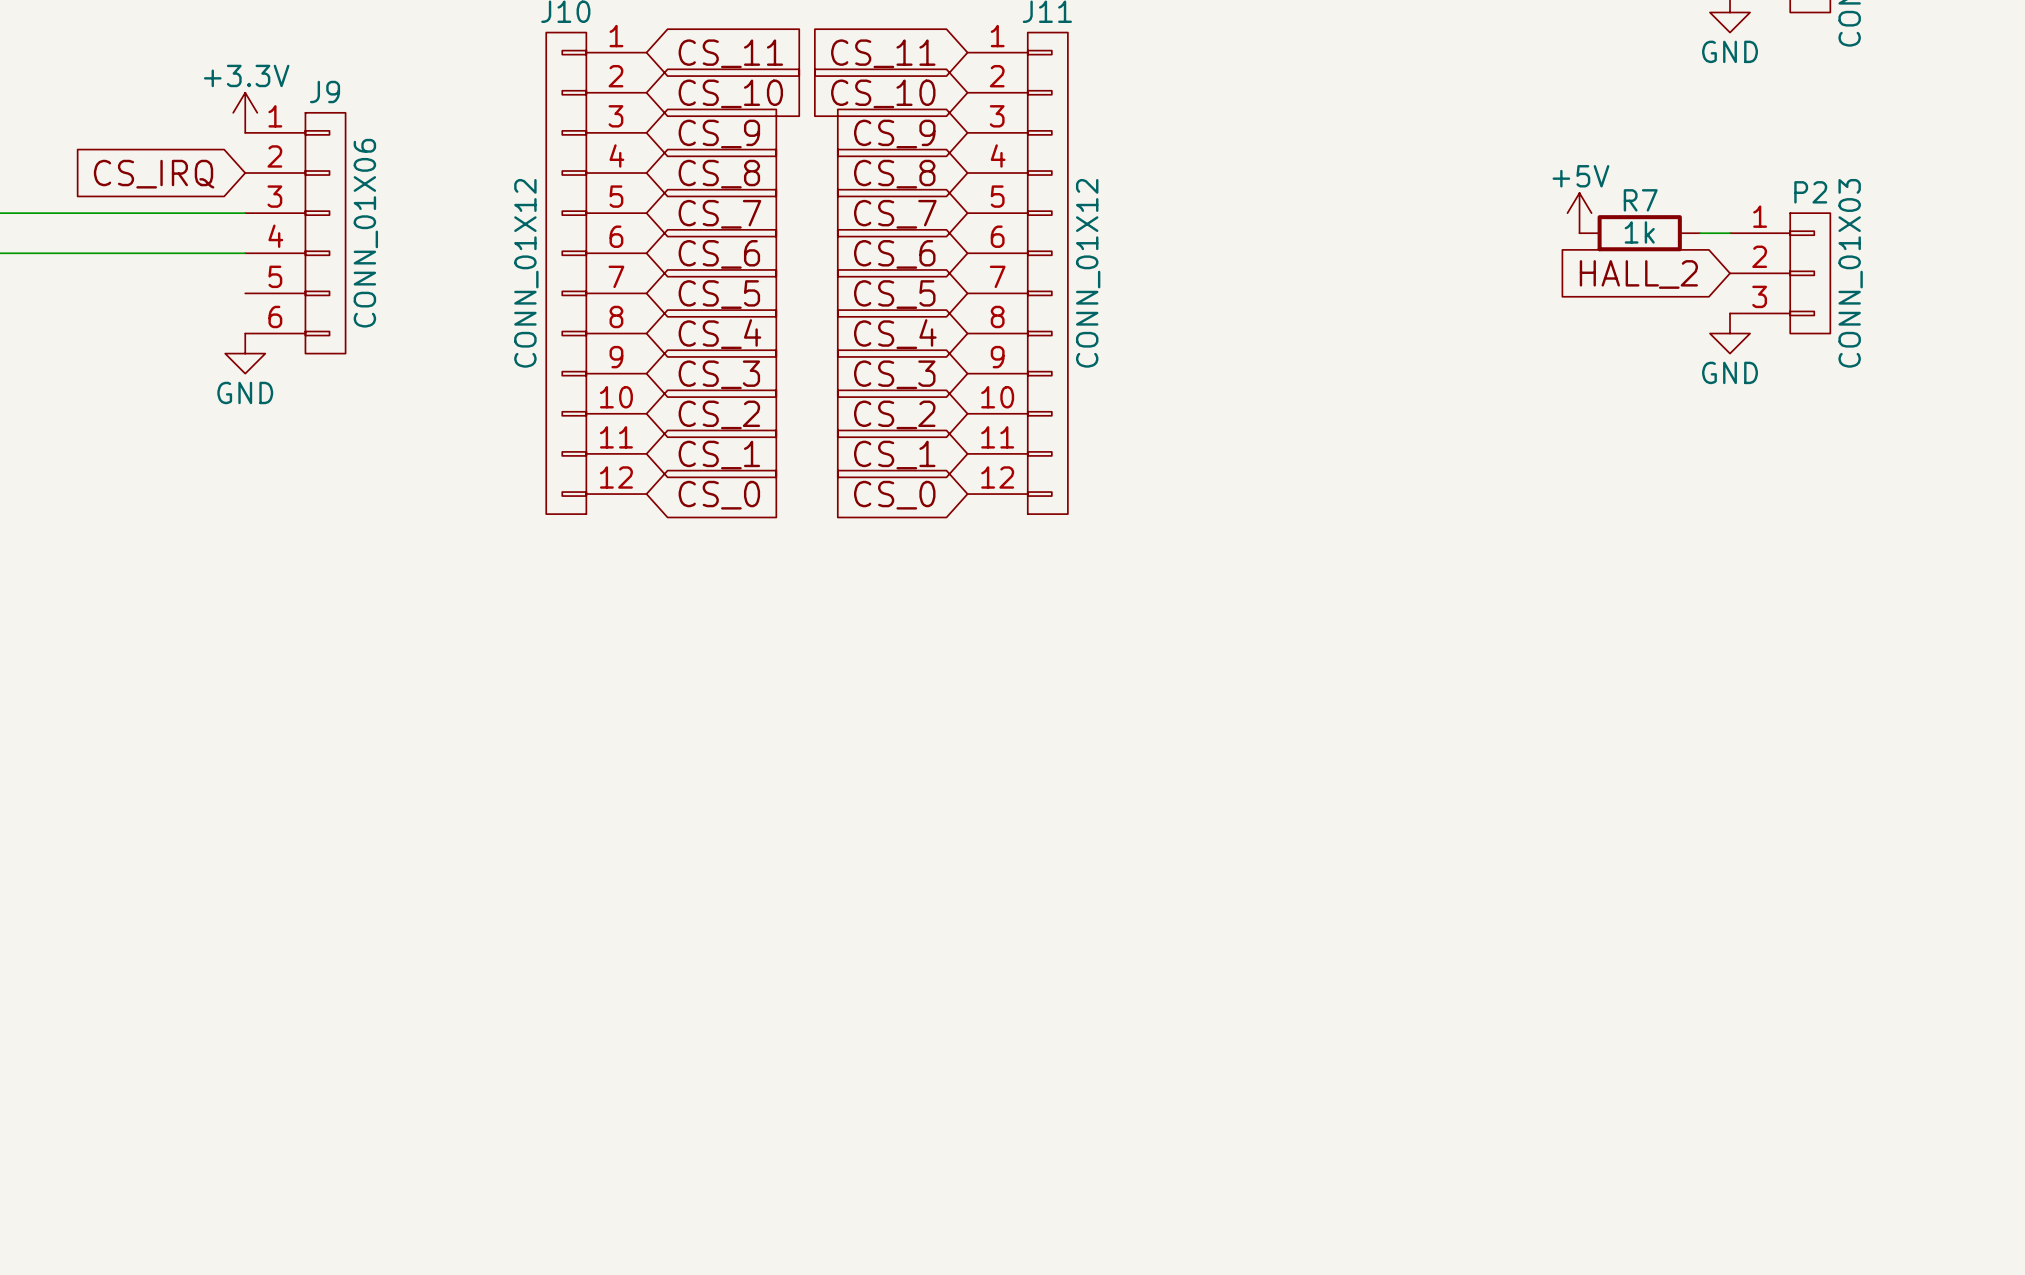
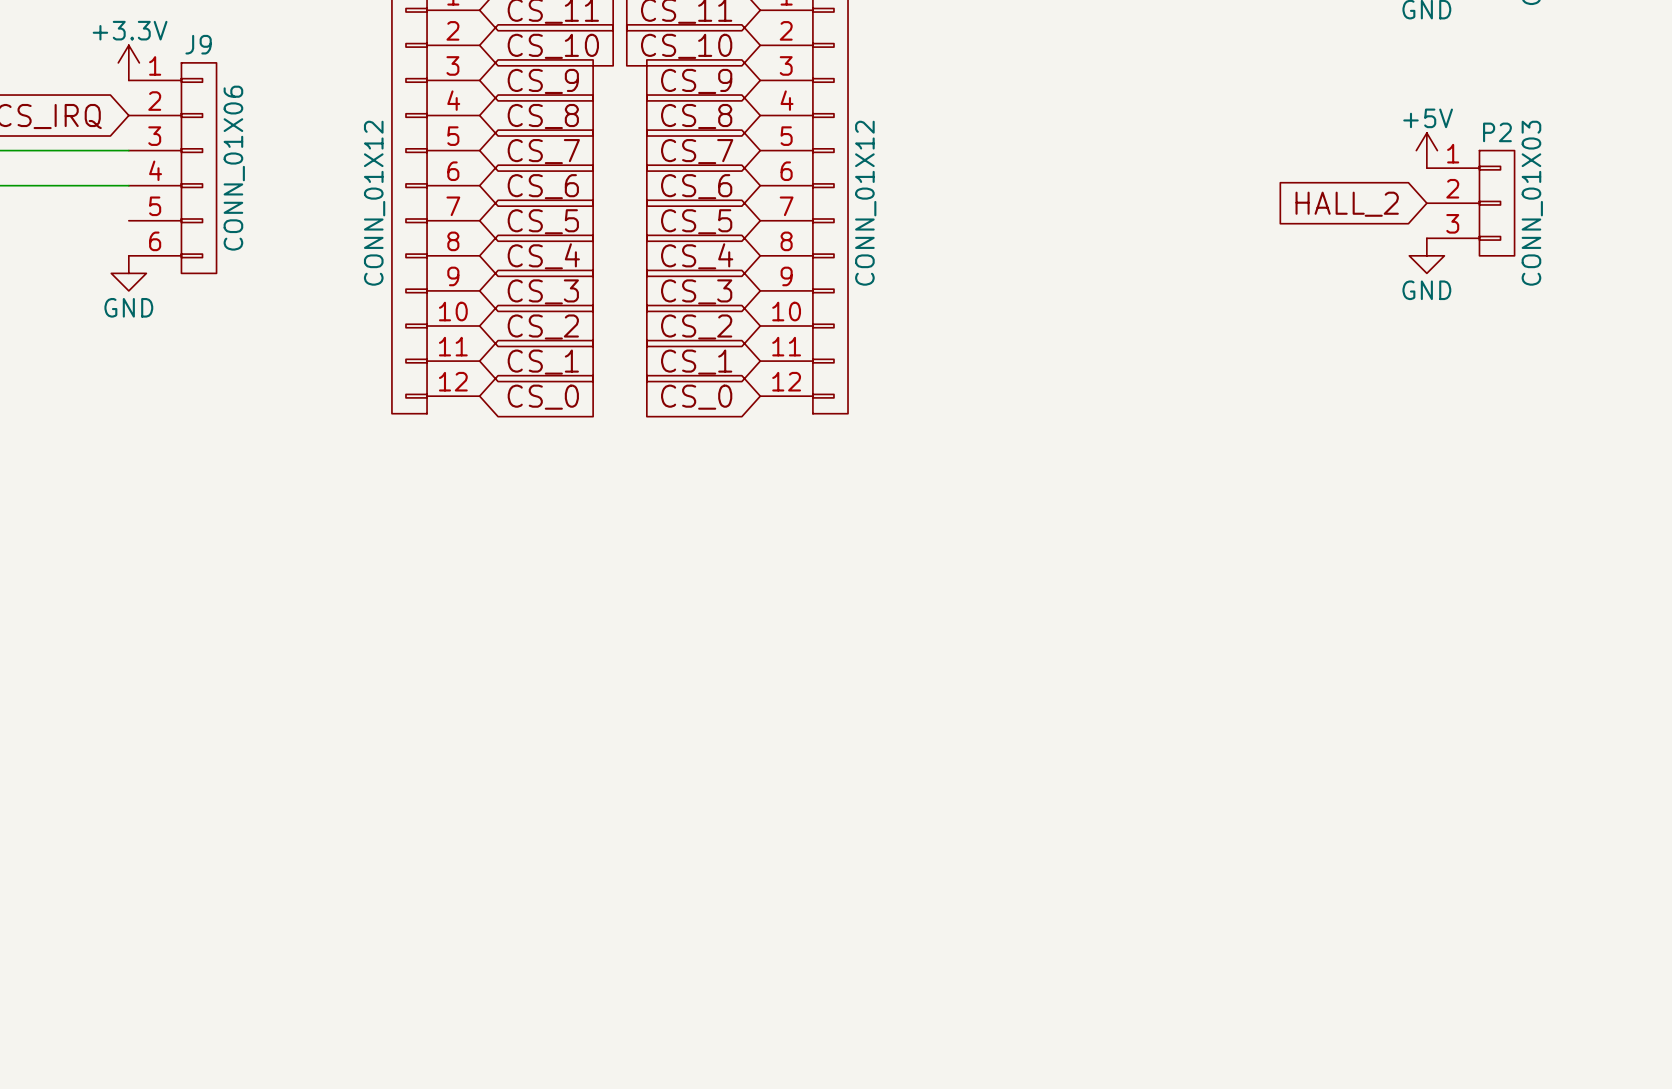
power symbol position: +5V (1579, 213) -> +5V (1426, 150)
R7: 1k (1639, 233) -> none
wire: (1699, 233) (1730, 233) -> none

